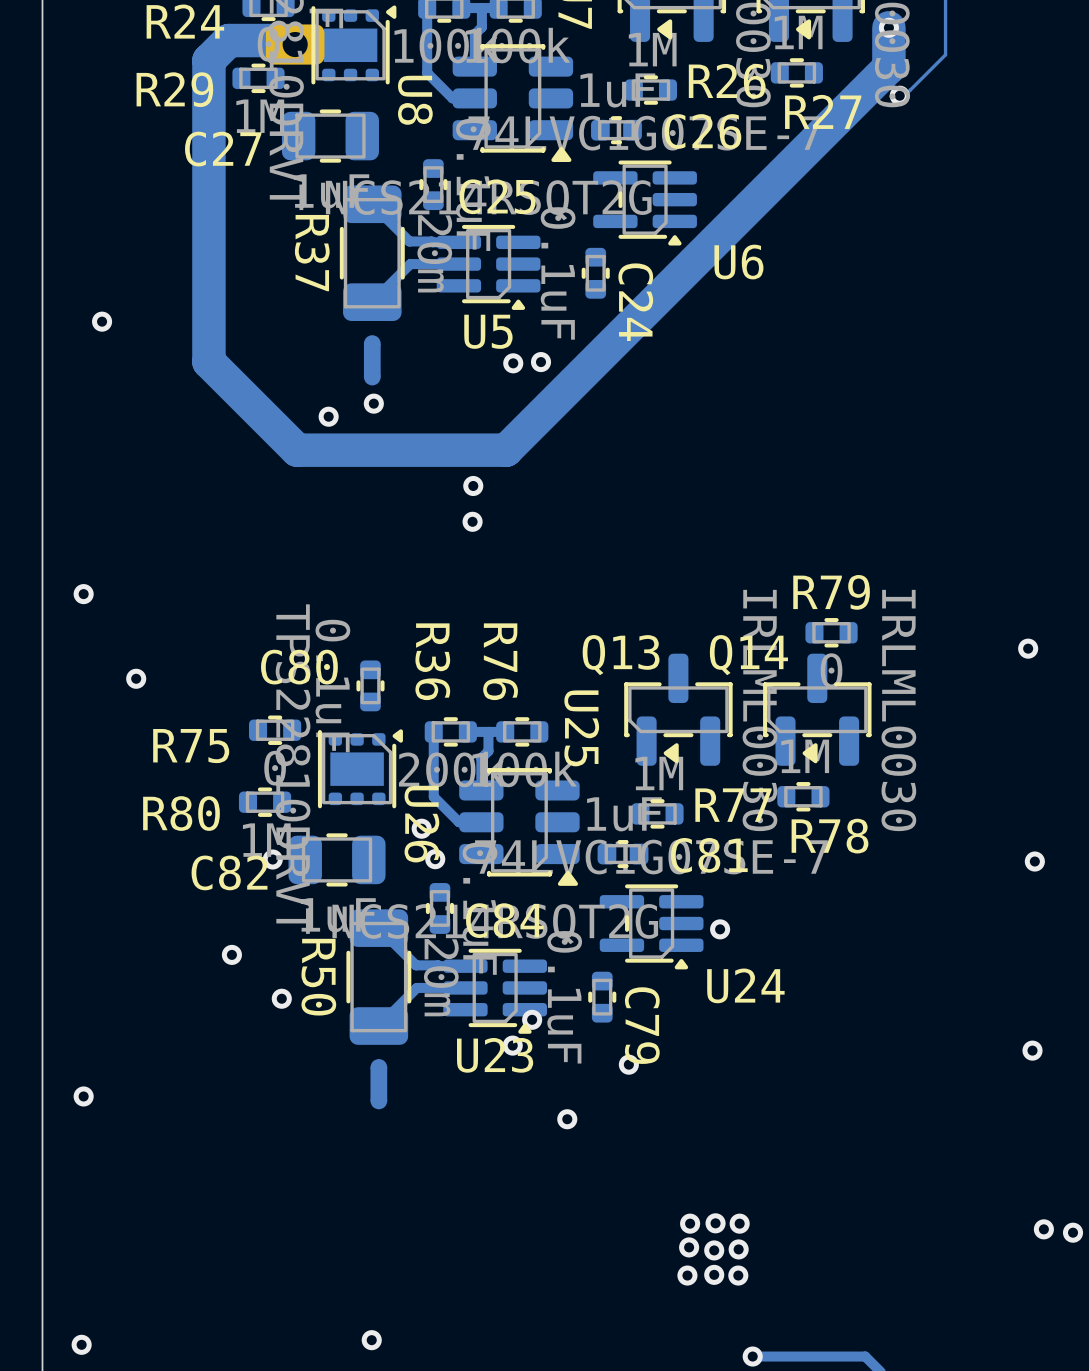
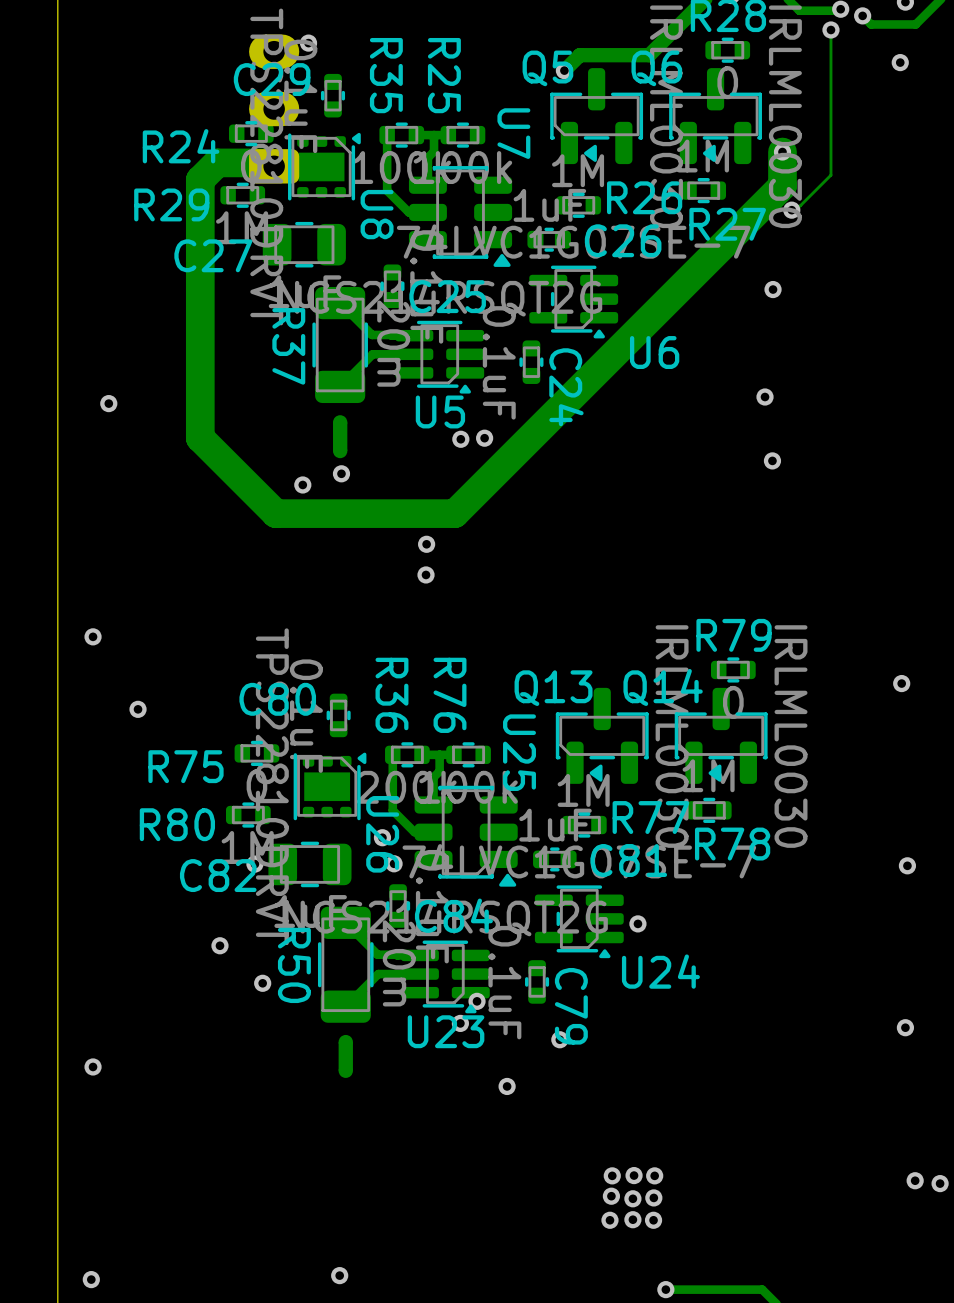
via: none -> (773, 289)
via: none -> (765, 397)
via: none -> (772, 460)

